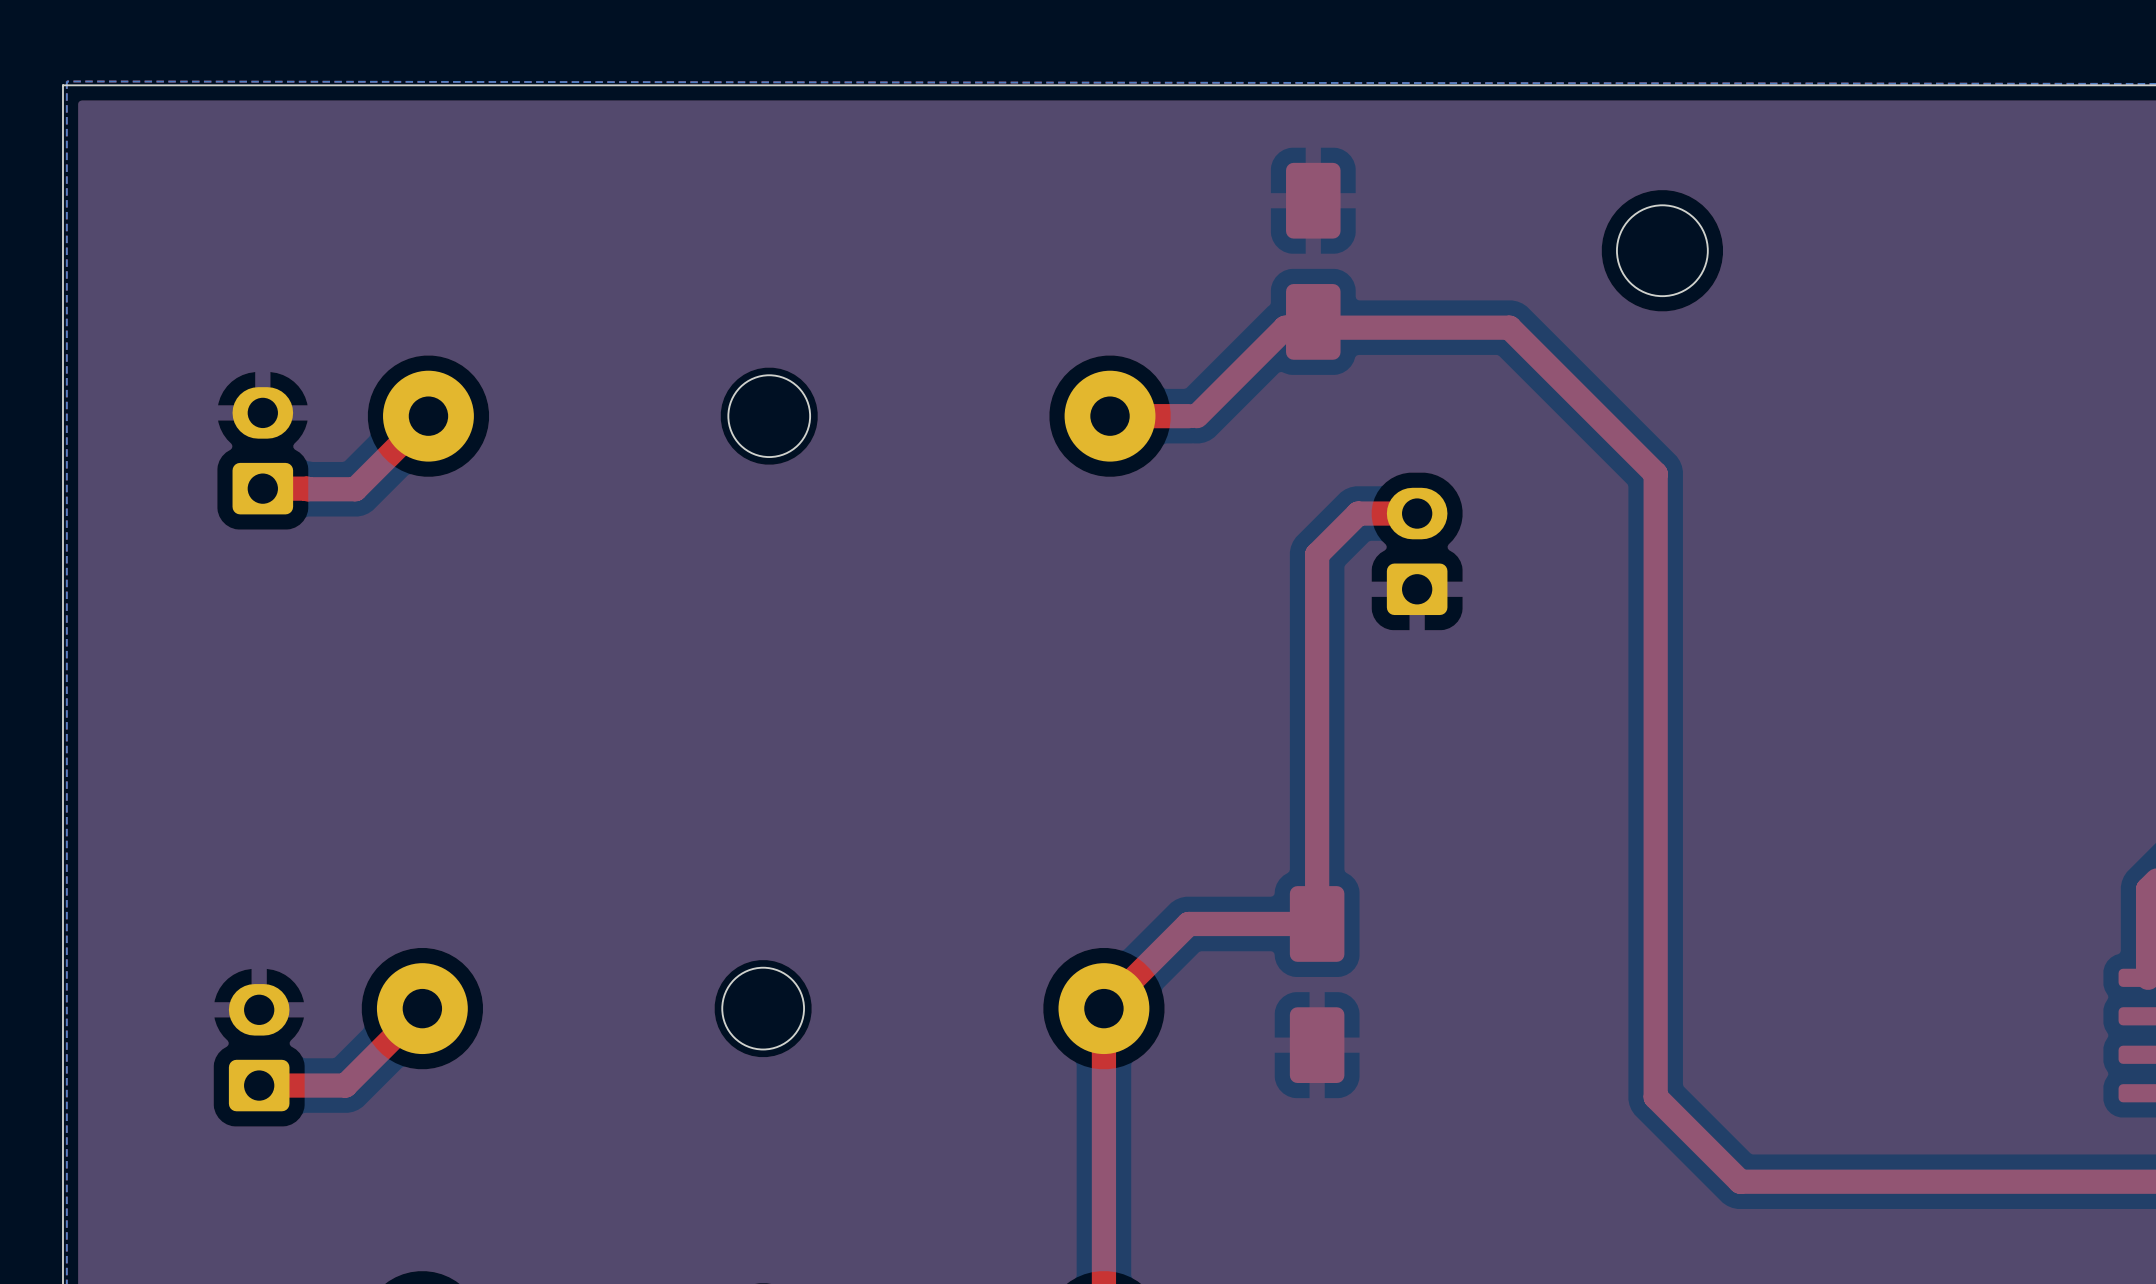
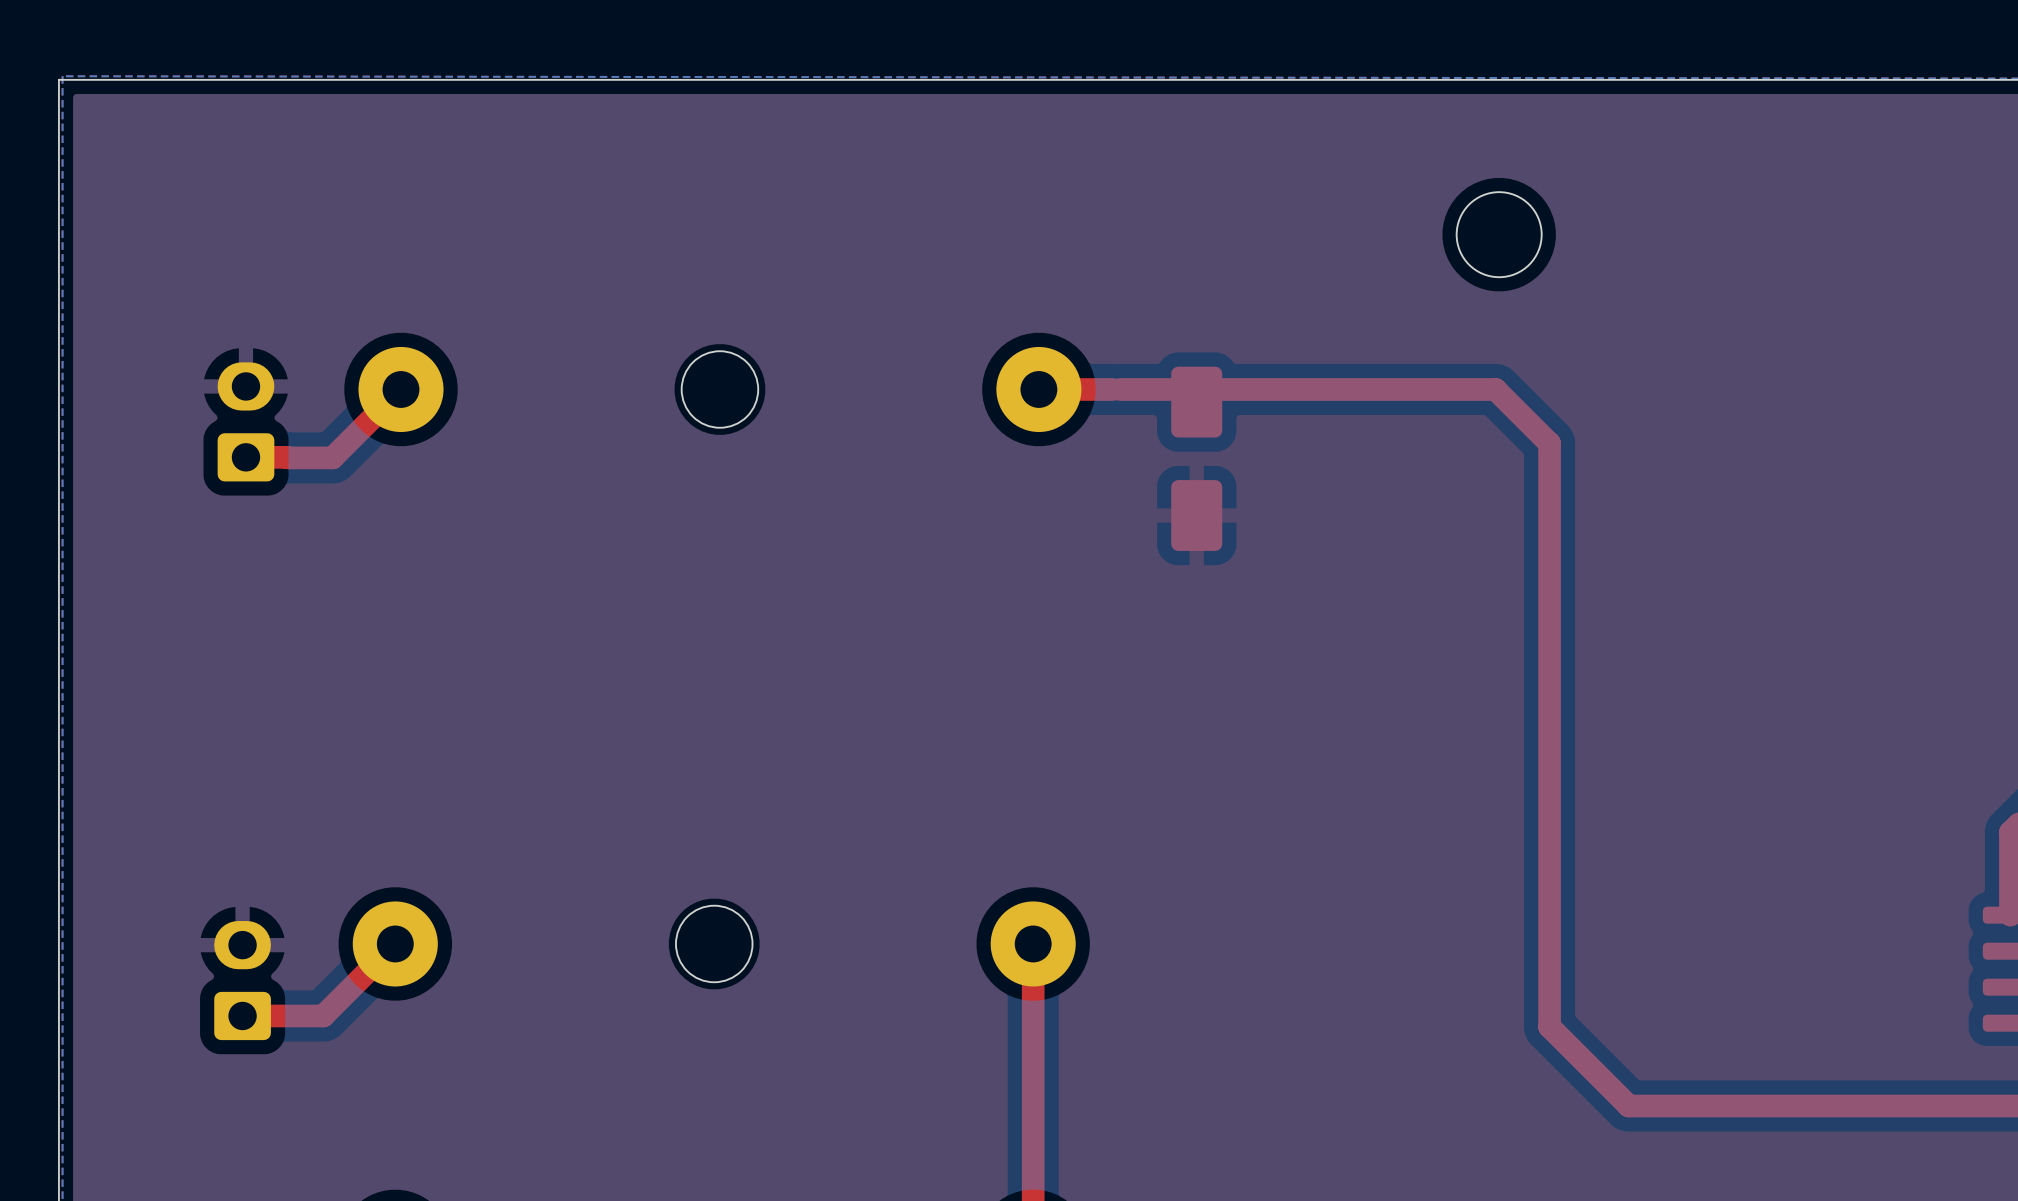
round board edge position: (1662, 250) -> (1499, 234)
part position: (1313, 261) -> (1196, 458)
top track: (1597, 416) (1509, 327) (1285, 327) (1196, 416) -> (1495, 389) (1120, 389)
top track: (1417, 513) (1358, 513) (1317, 554) (1317, 923) (1188, 923) (1103, 1008) -> none
part: (1417, 551) -> none
part: (1317, 984) -> none

